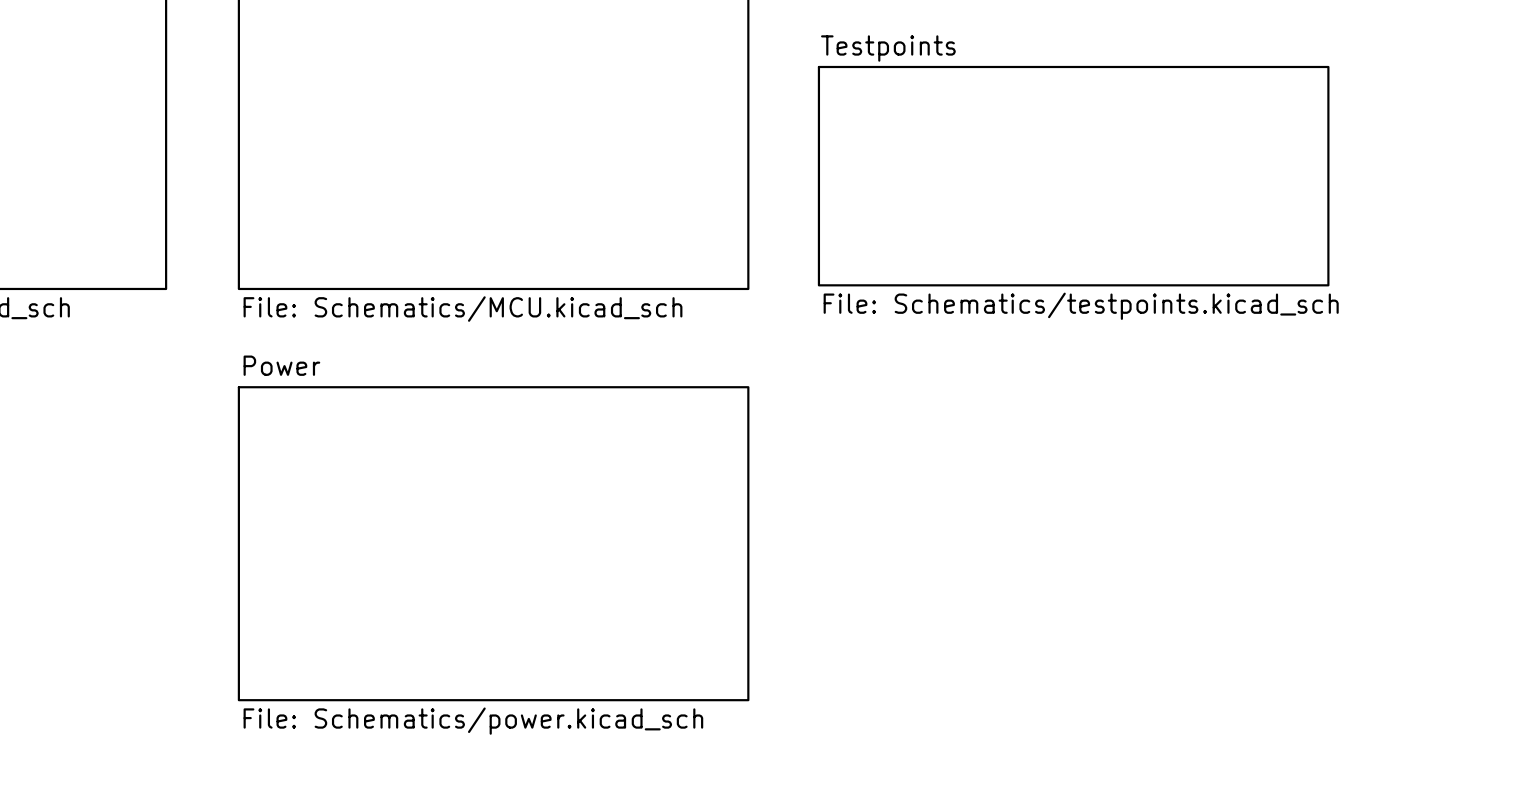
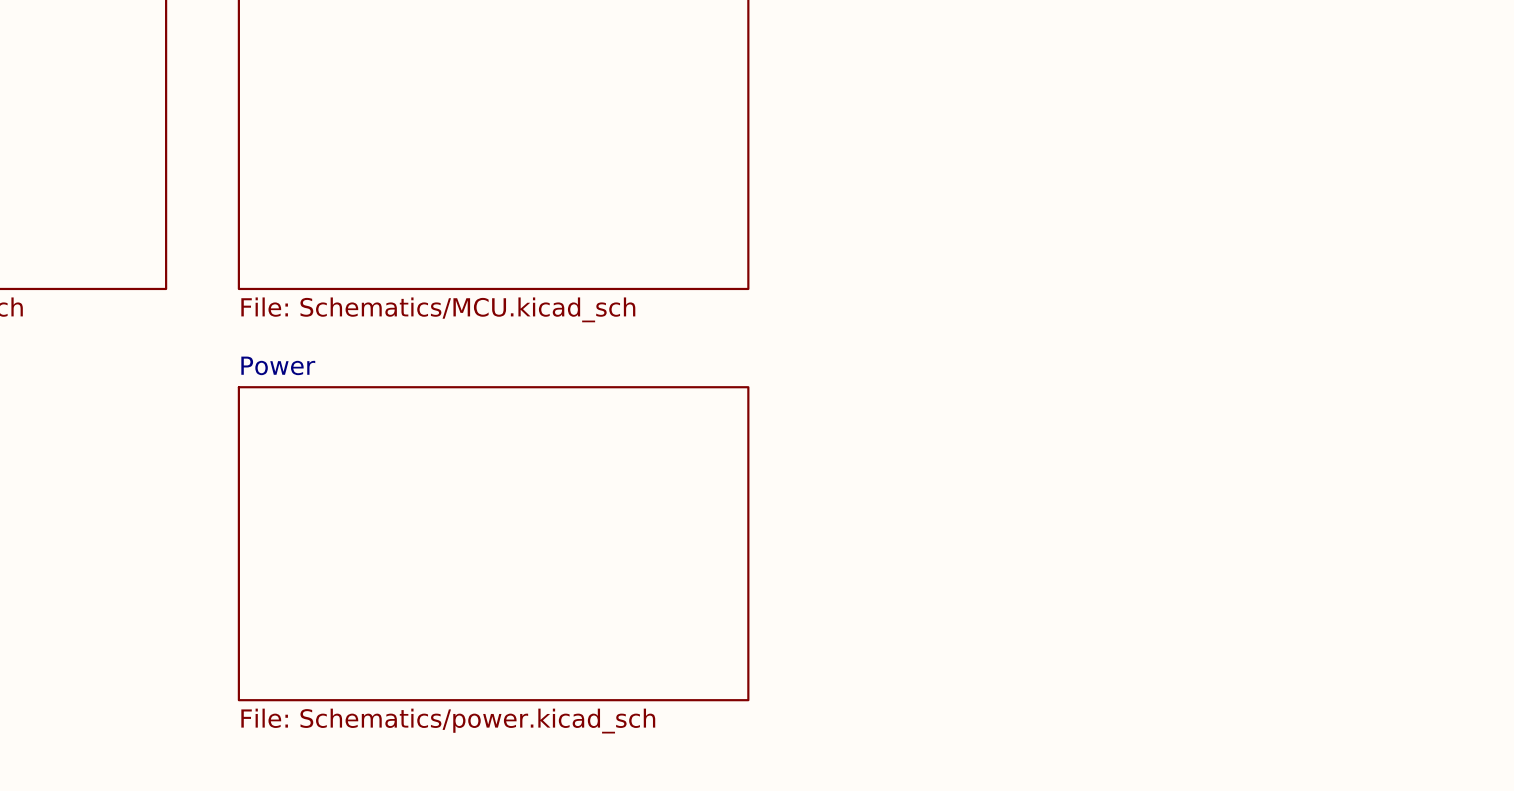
sheet Testpoints: File: Schematics/testpoints.kicad_sch (1073, 176) -> none

